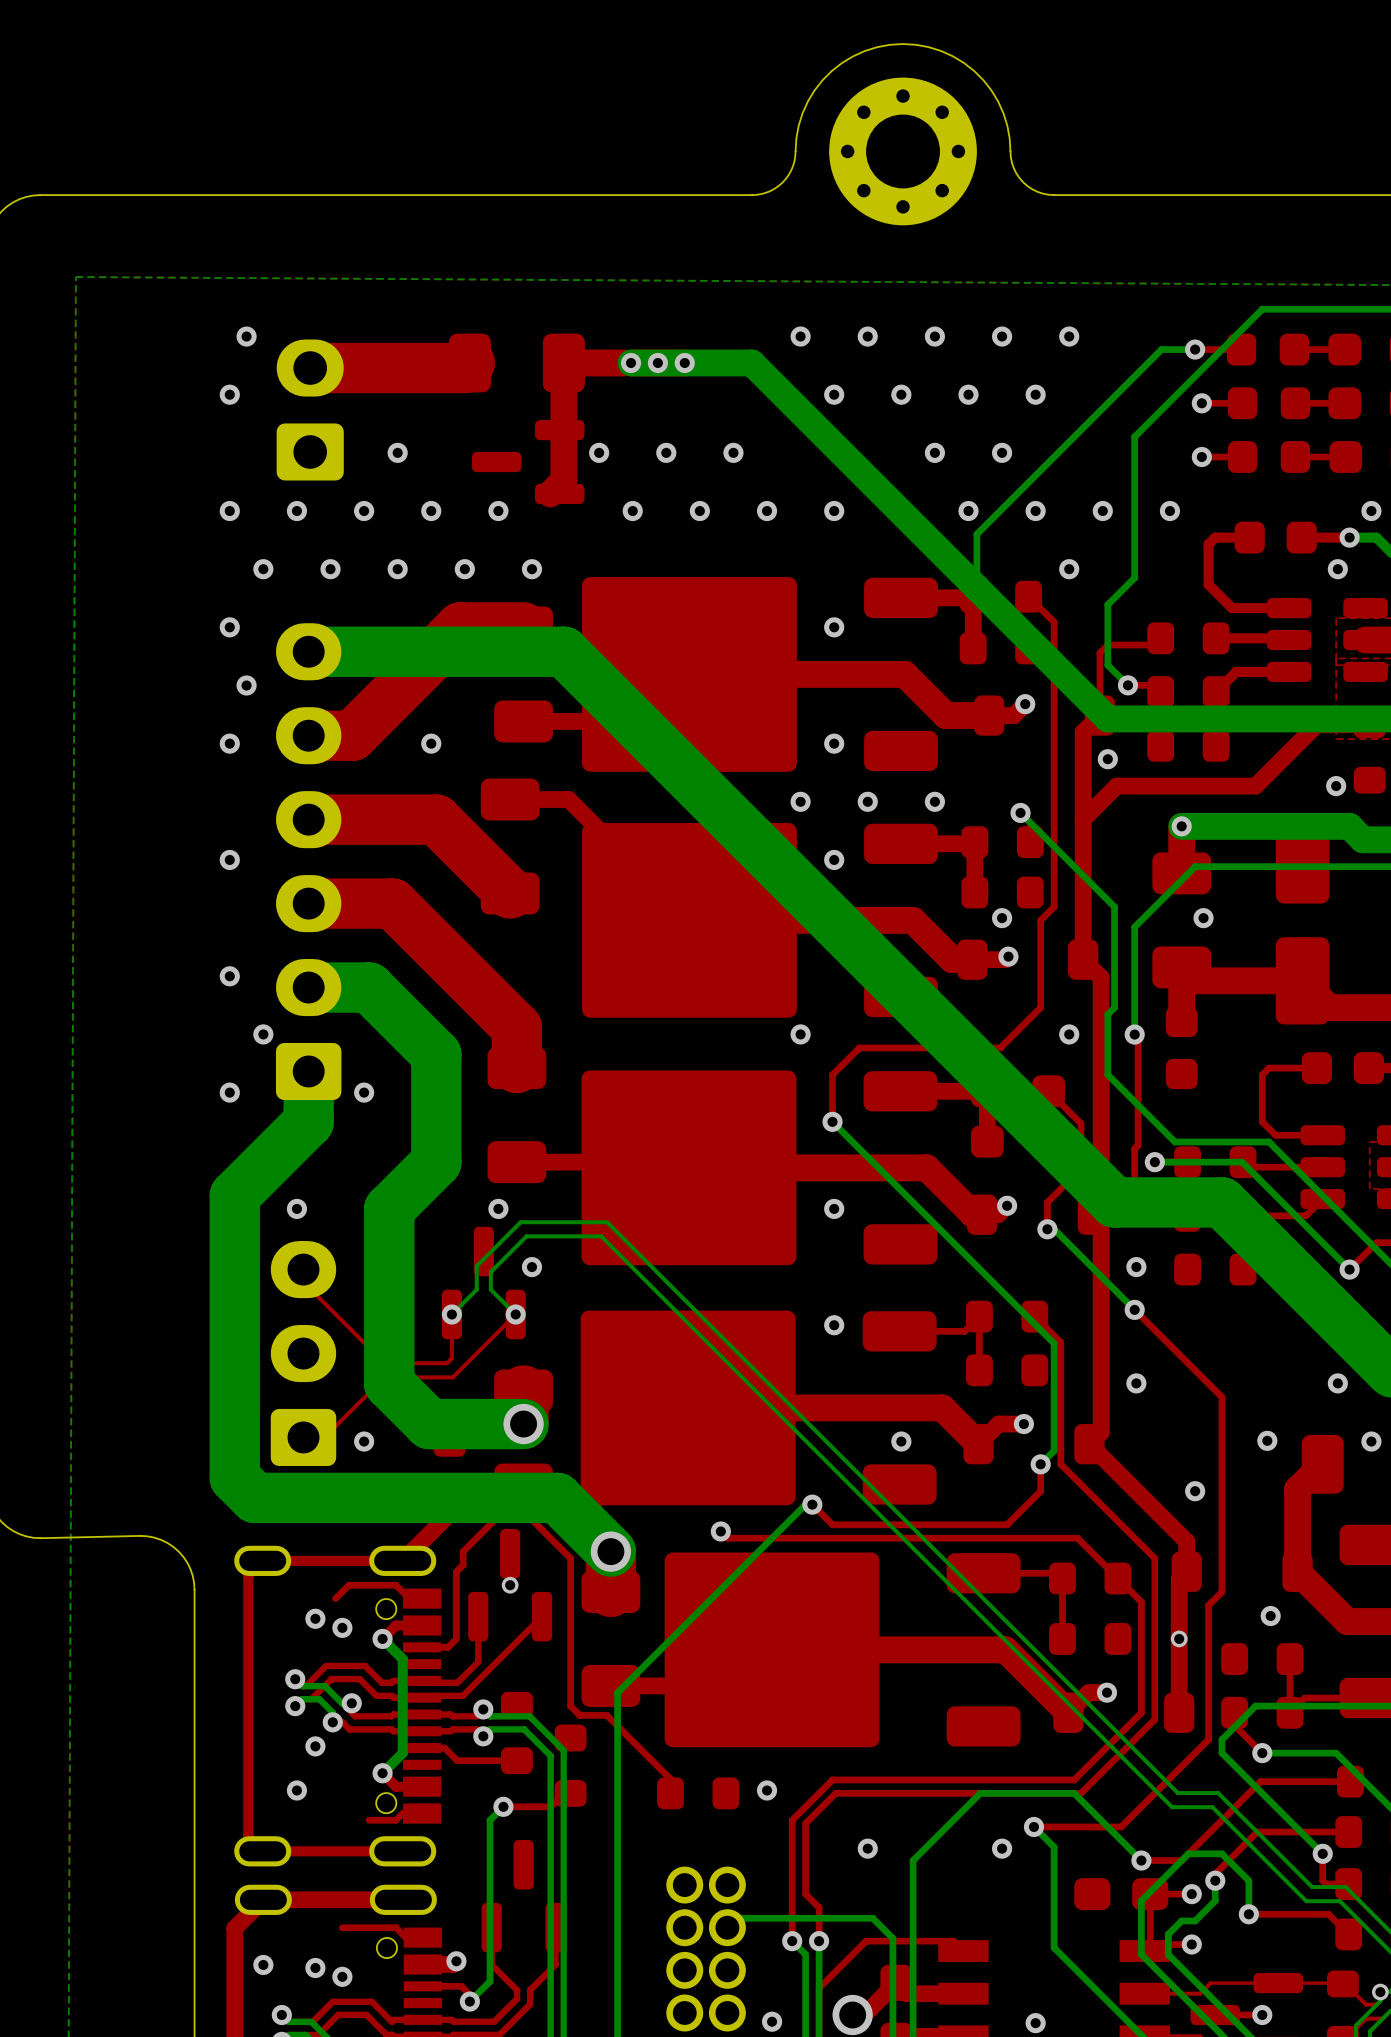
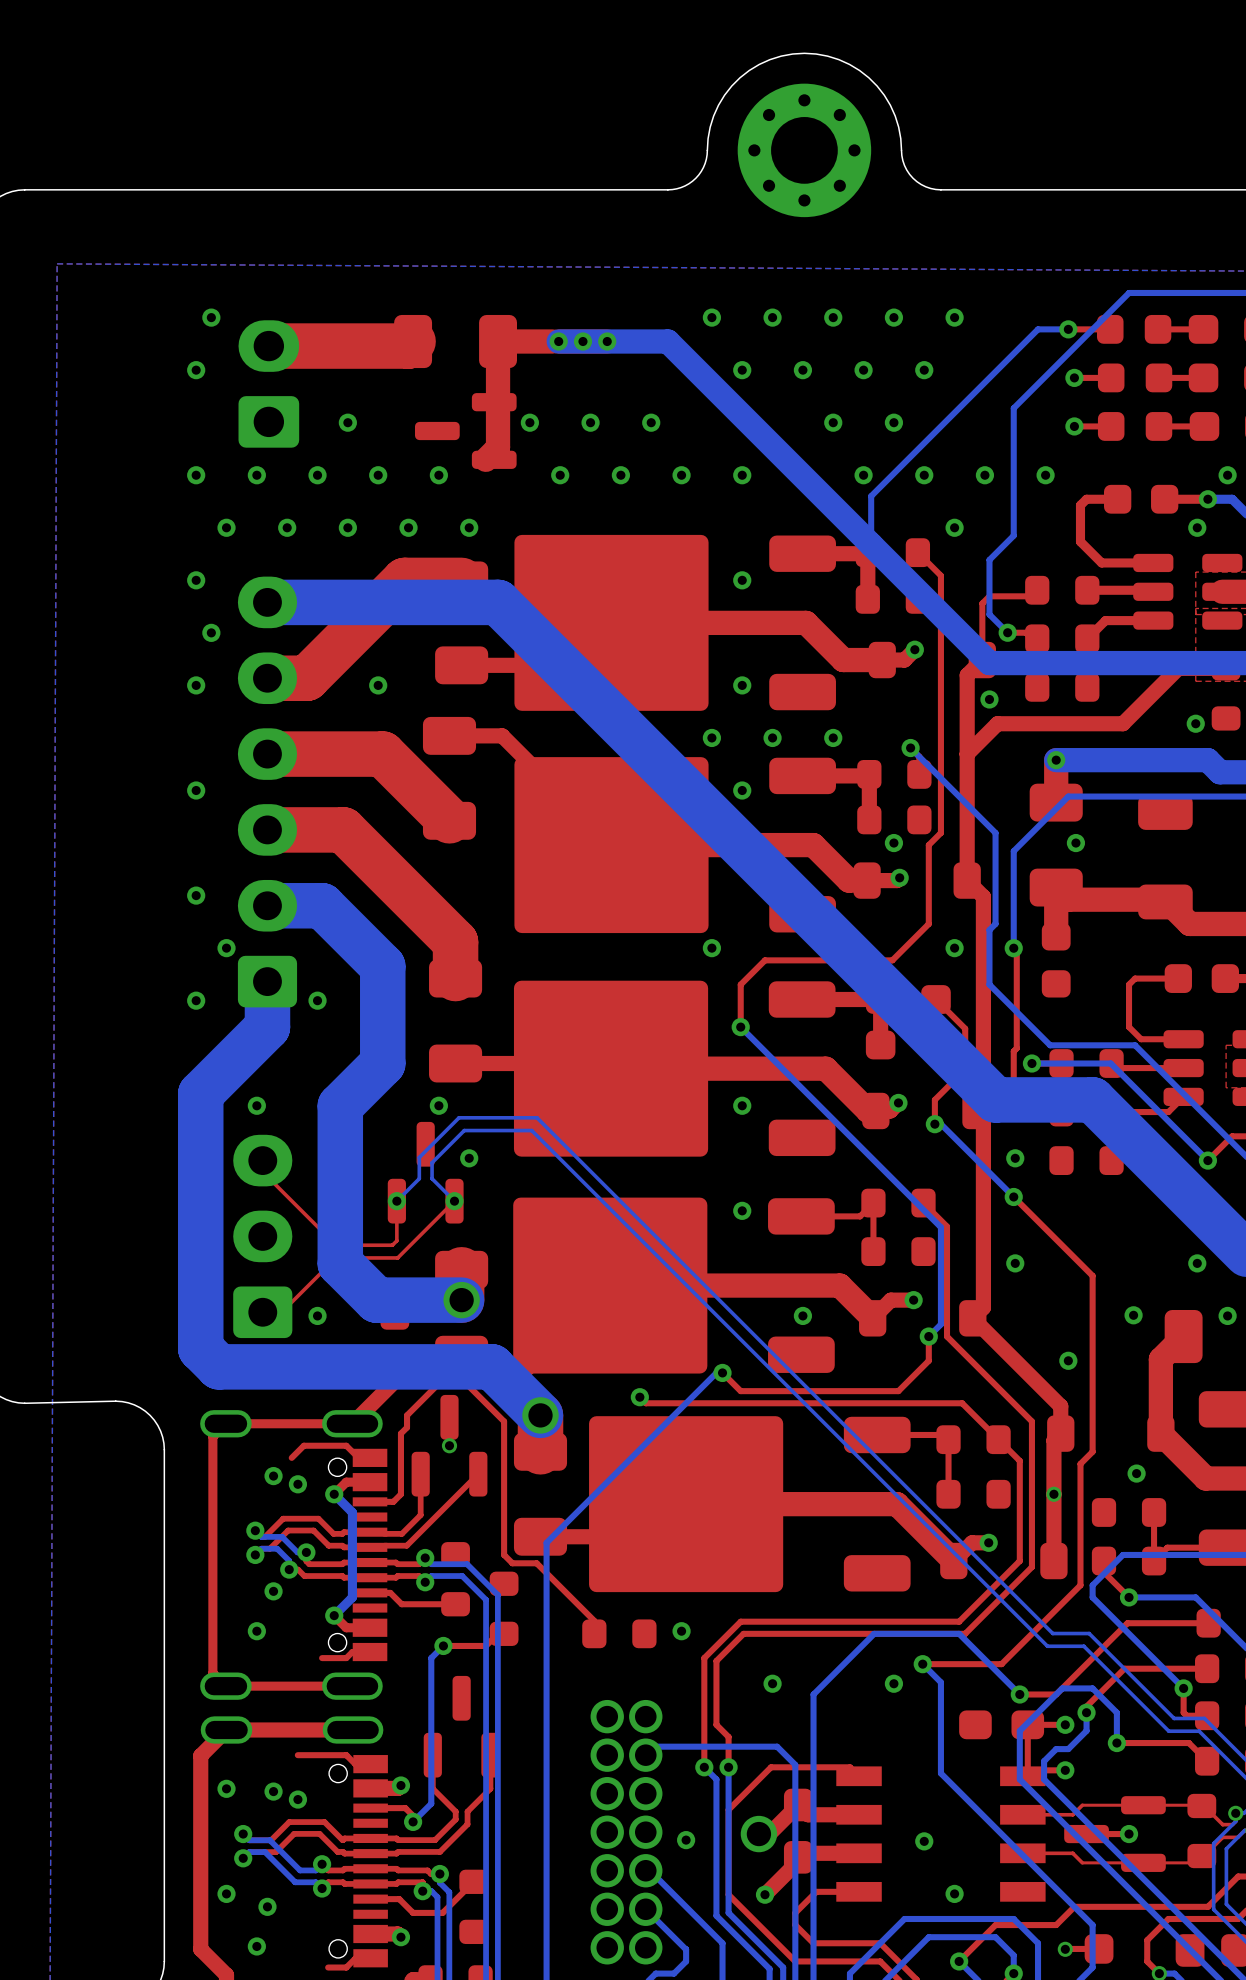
part footprint: [1275, 816, 1330, 1025] -> [1138, 795, 1193, 920]

